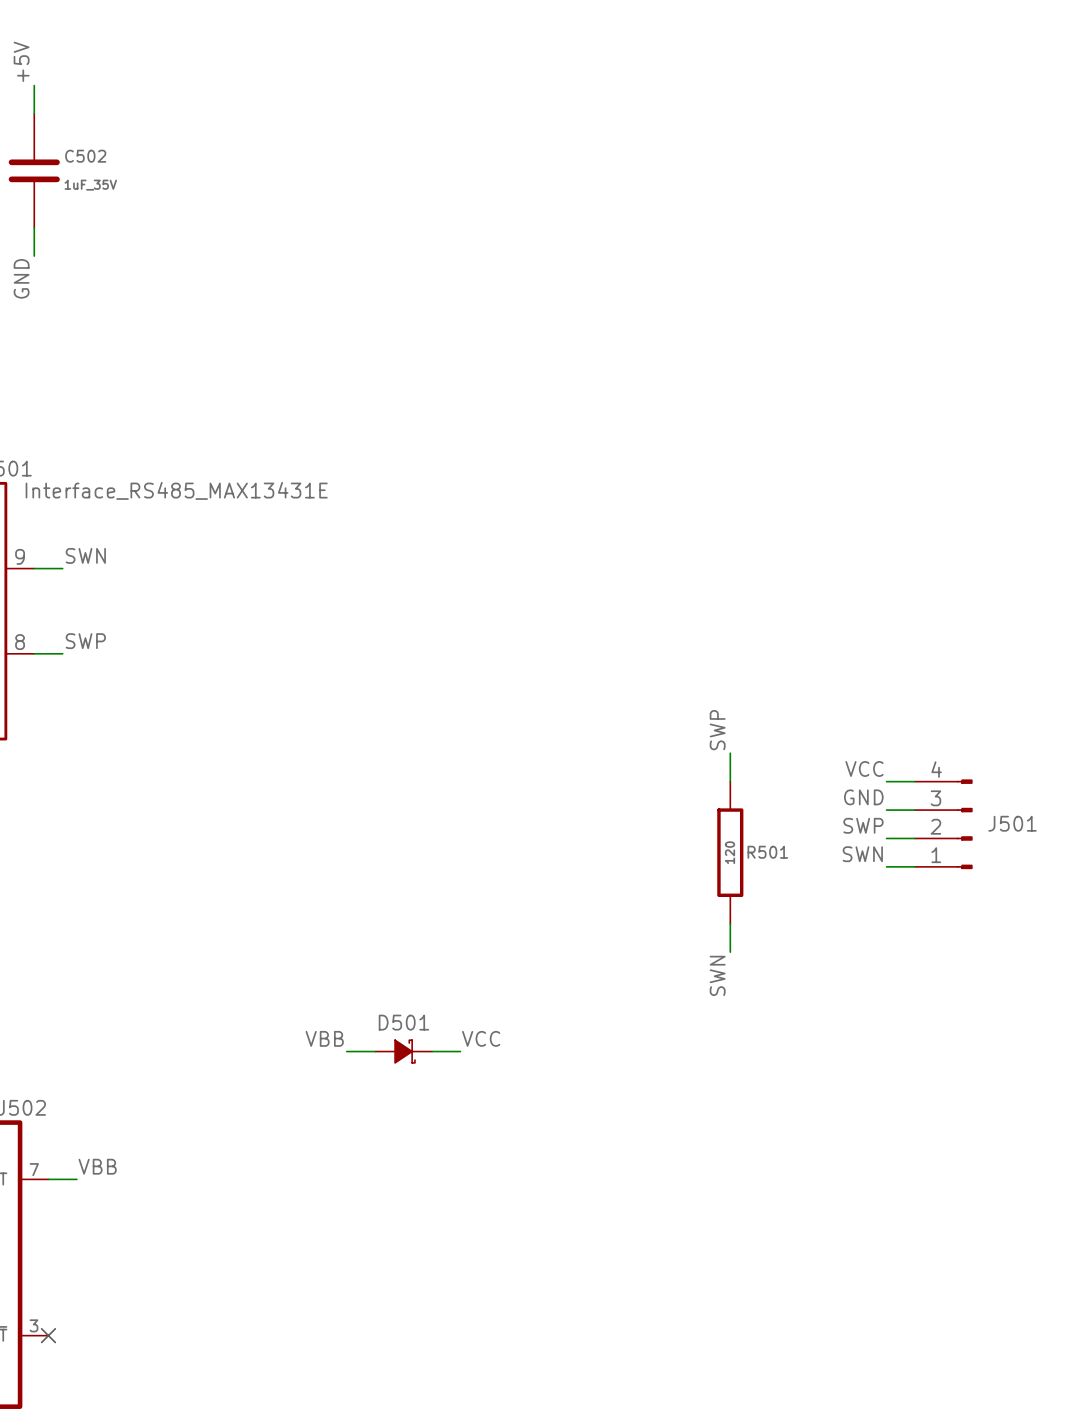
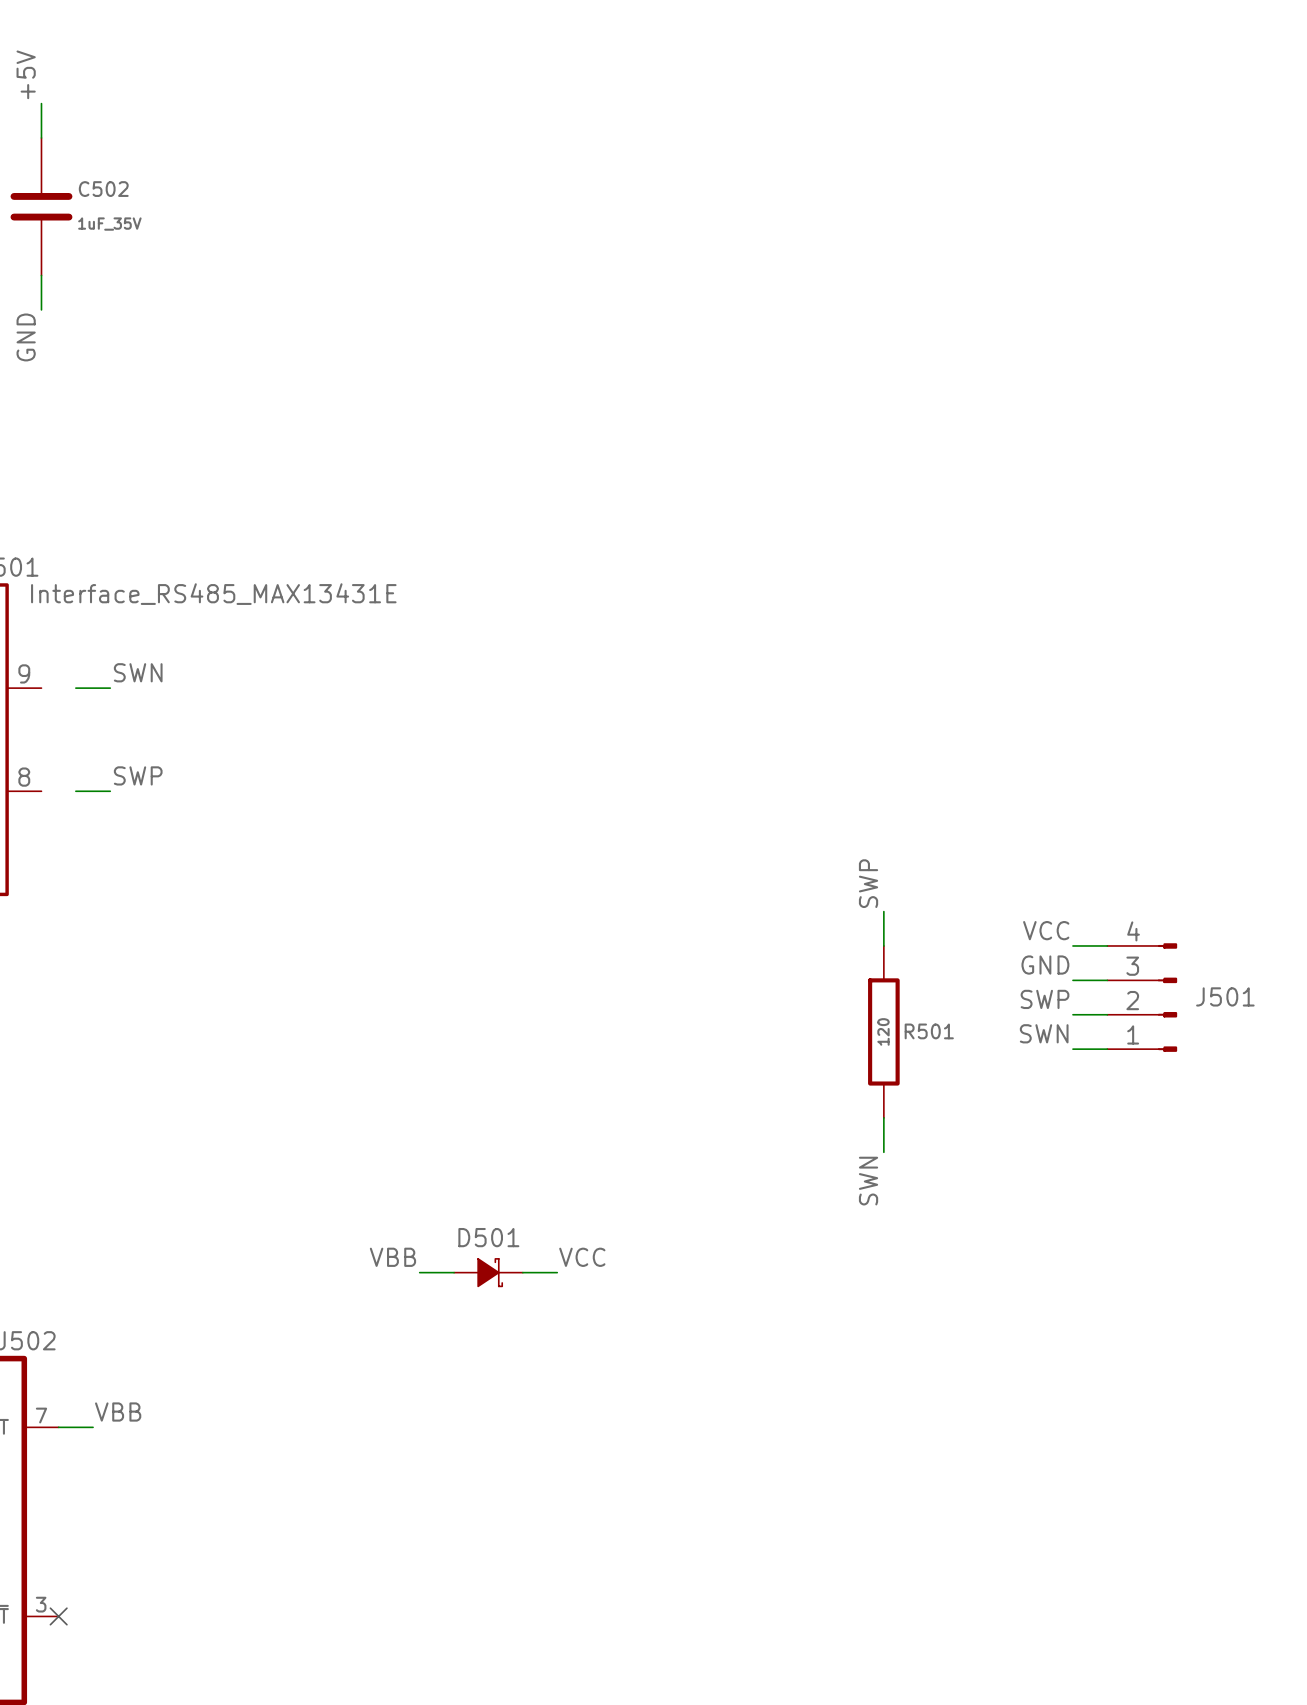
label position: SWN (85, 555) -> SWN (138, 672)
wire: (34, 568) (62, 568) -> (110, 688) (75, 688)
label position: SWP (85, 641) -> SWP (138, 775)
wire: (34, 653) (62, 653) -> (110, 791) (75, 791)

